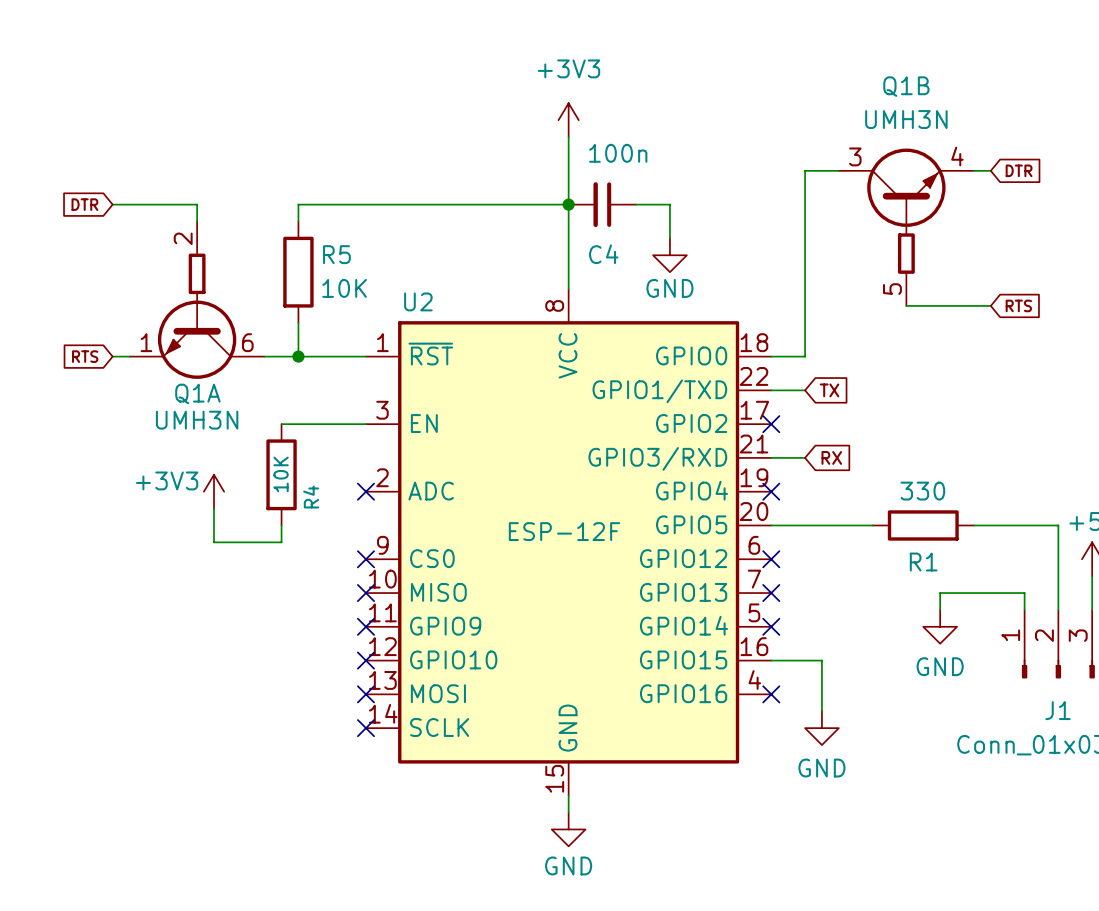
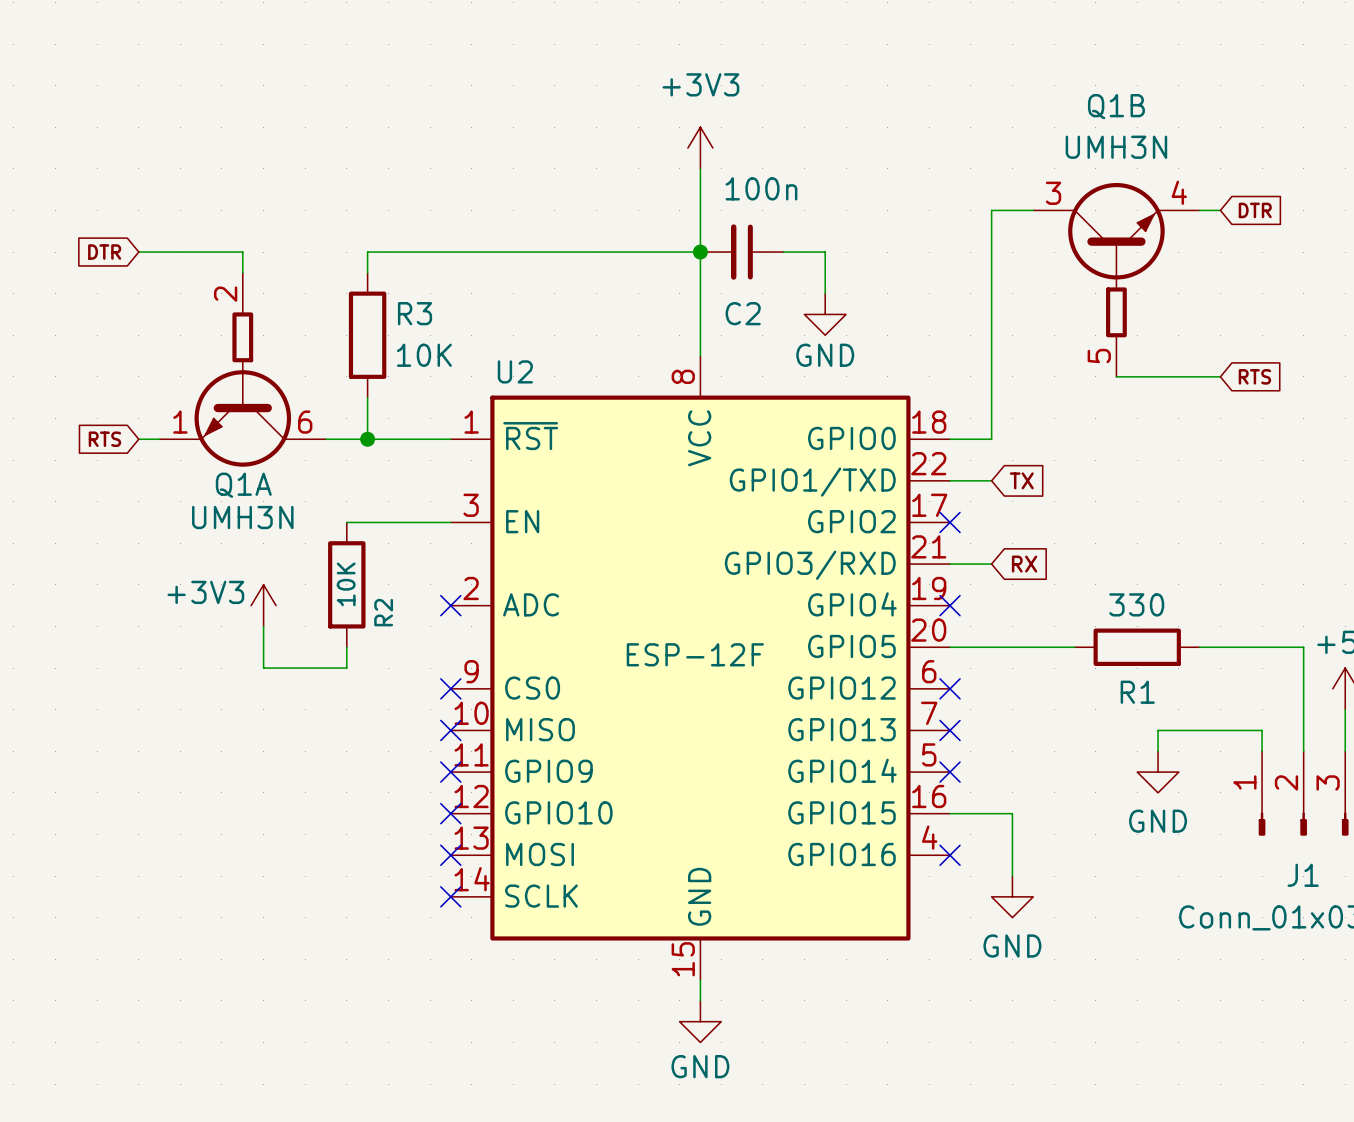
R5 name: R5 (336, 254) -> R3 (415, 313)
C4 name: C4 (603, 254) -> C2 (743, 313)
R4 name: R4 (311, 497) -> R2 (383, 612)

